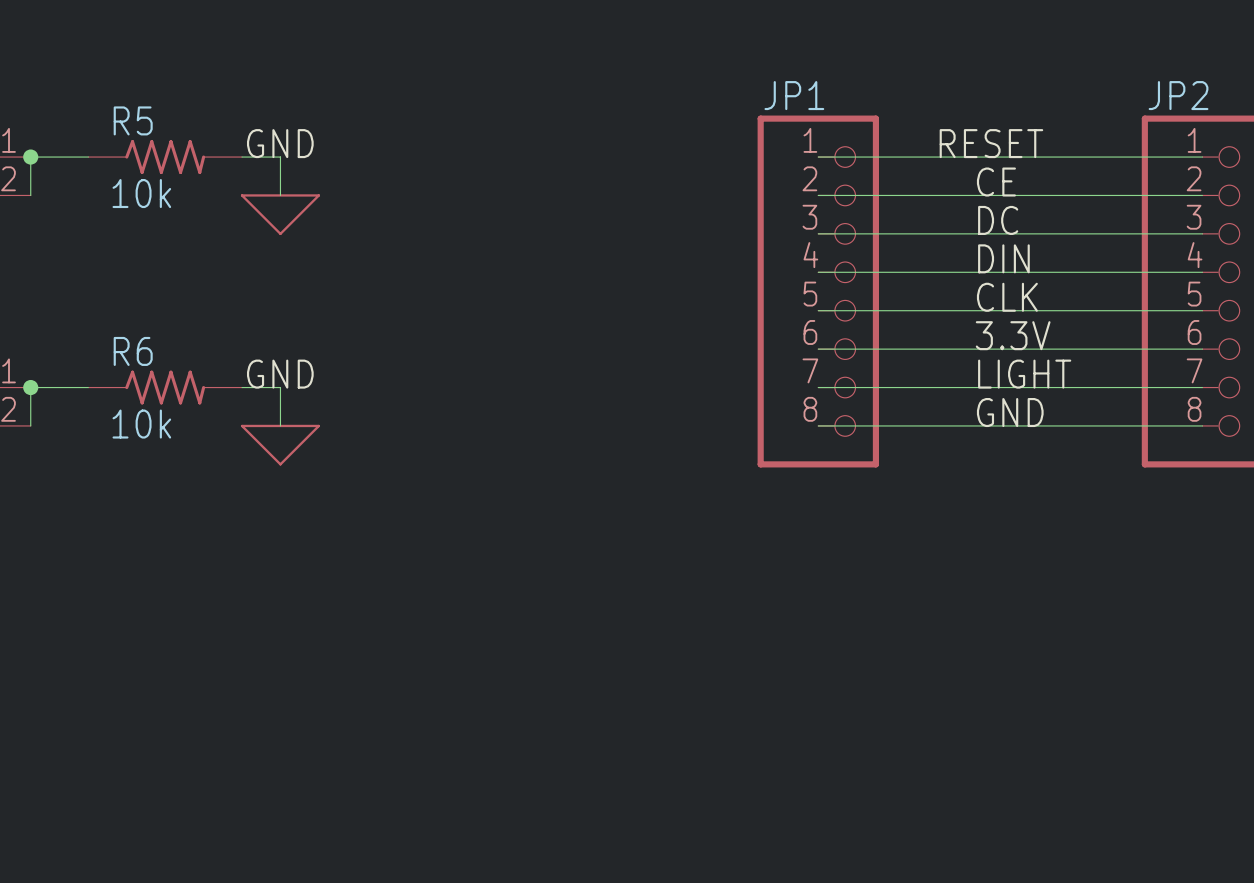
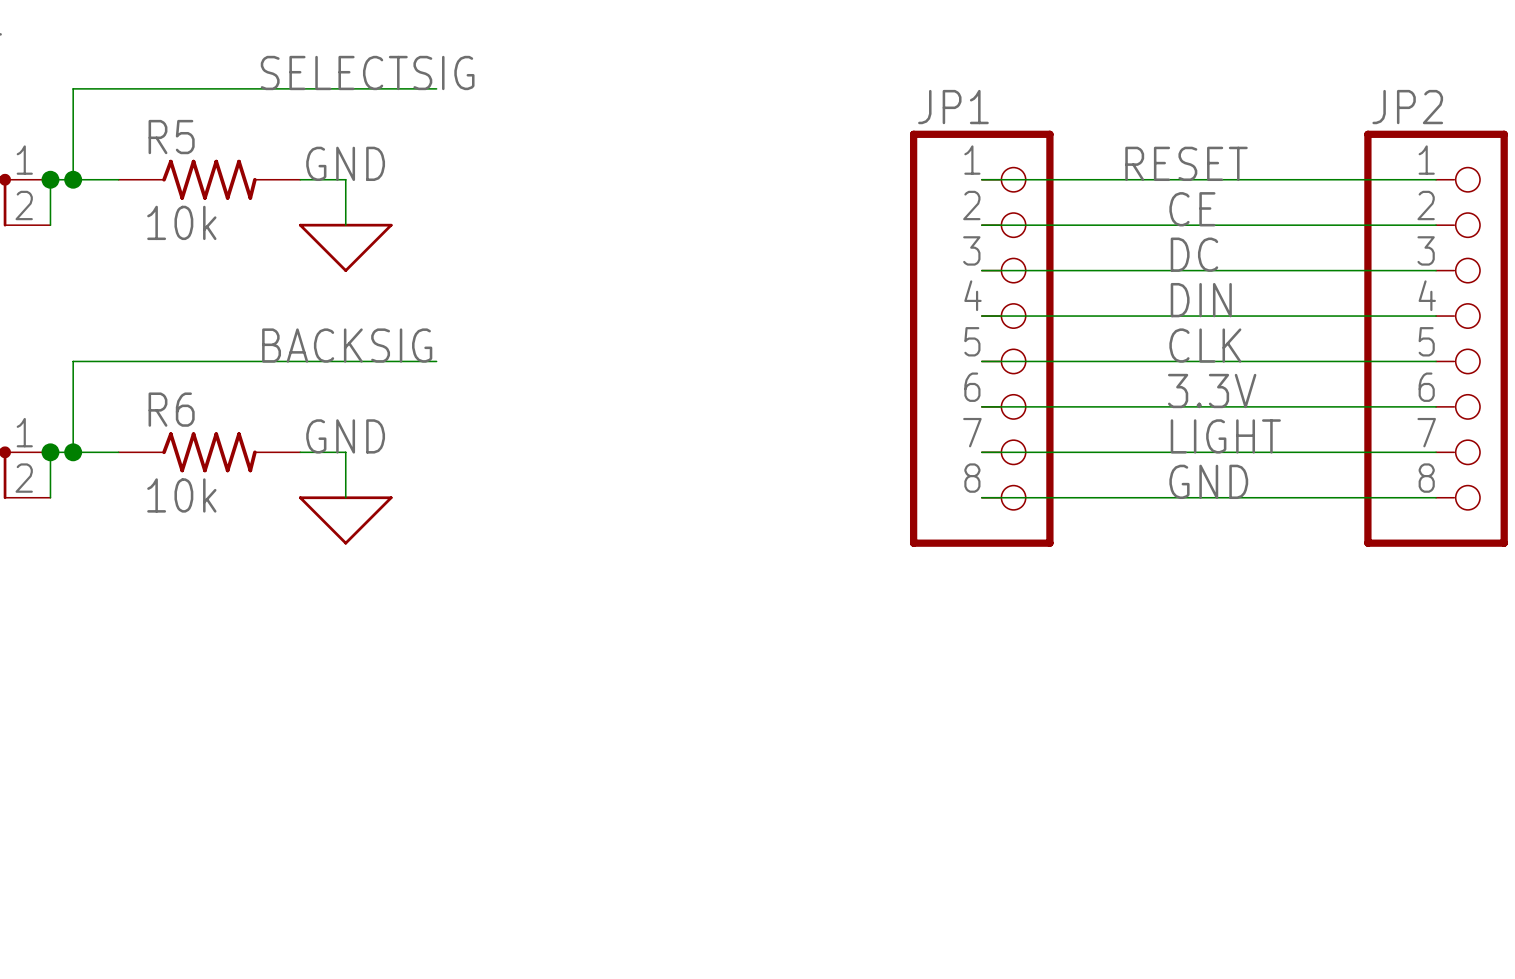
label: none -> SELECTSIG (367, 72)
wire: none -> (436, 88) (73, 88) (73, 179)
junction: none -> (73, 179)
label: none -> BACKSIG (347, 345)
wire: none -> (436, 361) (73, 361) (73, 452)
junction: none -> (73, 452)

